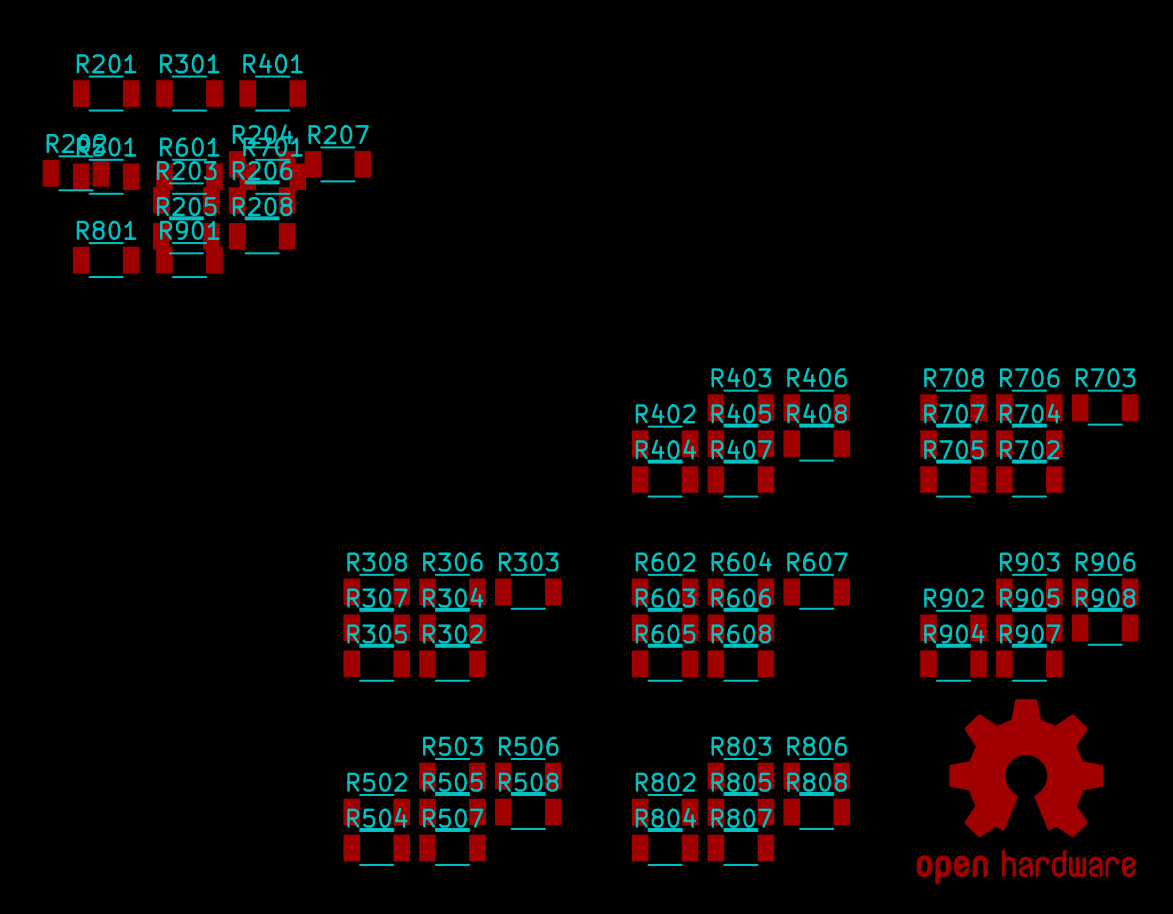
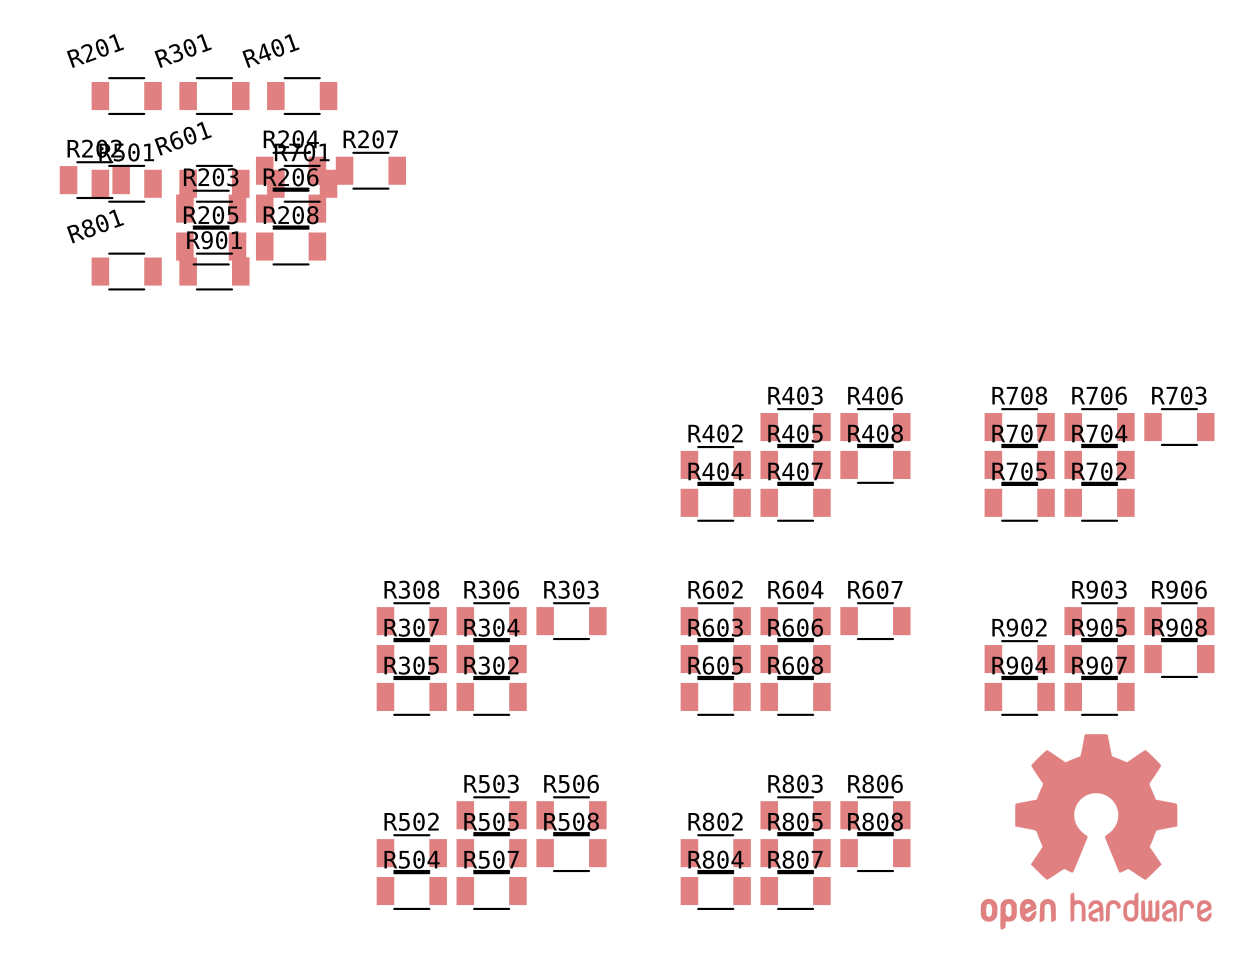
R201 name rotation: 0° (106, 63) -> 20° counterclockwise (95, 50)
R301 name rotation: 0° (189, 63) -> 20° counterclockwise (183, 50)
R401 name rotation: 0° (273, 63) -> 20° counterclockwise (270, 50)
R601 name rotation: 0° (189, 147) -> 20° counterclockwise (183, 138)
R801 name rotation: 0° (106, 230) -> 20° counterclockwise (95, 226)

